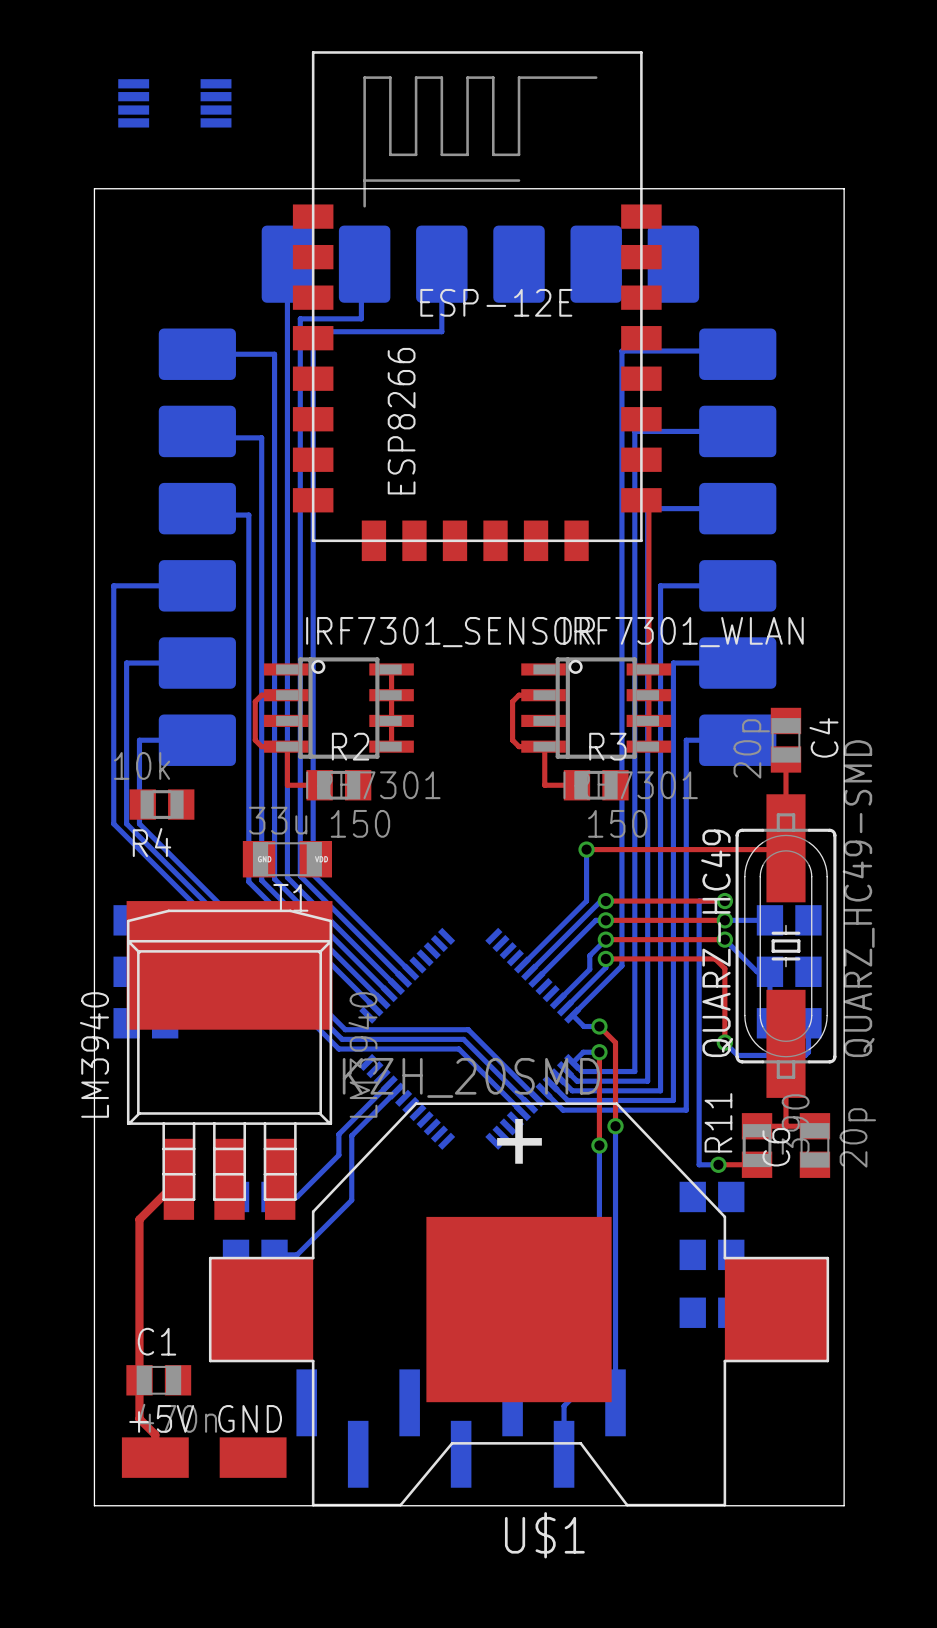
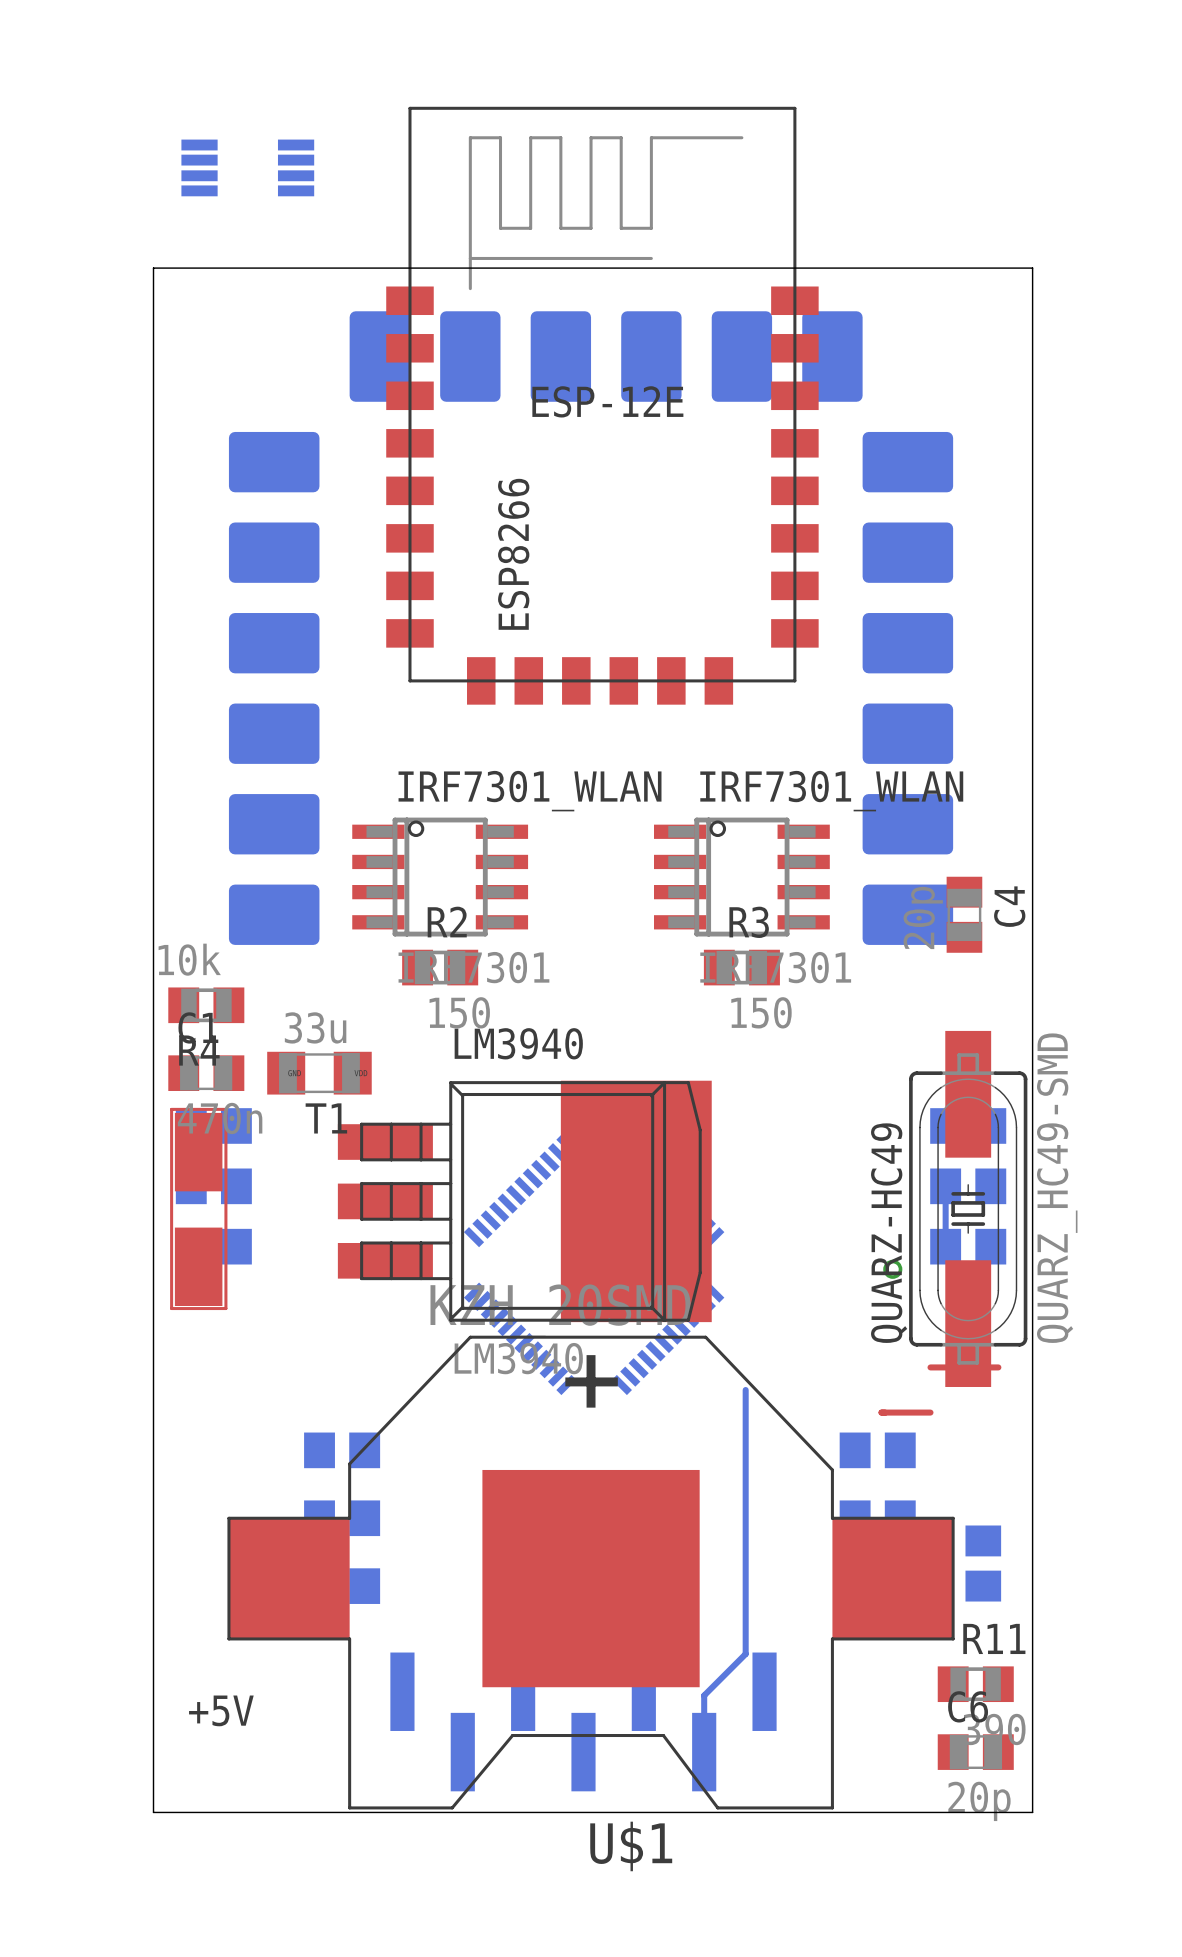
bottom track: (287, 264) (287, 877) (396, 986) -> none
bottom track: (364, 264) (361, 267) (361, 318) (300, 318) (300, 876) (403, 979) -> none
bottom track: (441, 264) (441, 331) (313, 331) (313, 874) (410, 972) -> none
bottom track: (197, 354) (274, 354) (274, 878) (389, 993) -> none
bottom track: (737, 354) (734, 351) (621, 351) (621, 965) (572, 1015) (583, 1026) (599, 1026) -> none
bottom track: (197, 431) (203, 437) (261, 437) (261, 880) (382, 1000) -> none
bottom track: (737, 431) (634, 431) (634, 1071) (581, 1071) (572, 1062) -> none
top track: (641, 500) (648, 507) (648, 746) -> none
bottom track: (197, 508) (203, 515) (248, 515) (248, 881) (374, 1008) -> none
bottom track: (737, 508) (647, 508) (647, 1081) (577, 1081) (565, 1069) -> none
bottom track: (197, 585) (113, 585) (113, 823) (338, 1049) (458, 1049) (522, 1112) -> none
bottom track: (737, 585) (660, 585) (660, 1090) (572, 1090) (558, 1076) -> none
IRF7301_SENSOR name: IRF7301_SENSOR (450, 632) -> IRF7301_WLAN (530, 791)
bottom track: (197, 663) (126, 663) (126, 823) (342, 1039) (463, 1039) (529, 1105) -> none
bottom track: (737, 663) (673, 663) (673, 1100) (567, 1100) (551, 1083) -> none
top track: (391, 669) (391, 746) -> none
top track: (286, 695) (261, 695) (255, 701) (255, 740) (261, 746) (287, 747) (287, 785) (319, 785) -> none
top track: (543, 695) (519, 695) (512, 701) (512, 740) (519, 746) (544, 747) (544, 785) (576, 785) -> none
bottom track: (197, 740) (139, 740) (139, 823) (345, 1029) (468, 1029) (536, 1098) -> none
bottom track: (737, 740) (686, 740) (686, 1110) (563, 1110) (544, 1091) -> none
top track: (785, 759) (784, 849) (586, 849) -> none
R4 position: (161, 804) -> (206, 1005)
bottom track: (586, 849) (586, 900) (522, 965) -> none
via: (586, 849) -> none
T1 position: (287, 859) -> (319, 1073)
top track: (605, 901) (724, 901) -> none
bottom track: (605, 901) (600, 901) (529, 972) -> none
via: (605, 901) -> none
bottom track: (724, 901) (699, 901) (699, 1164) (718, 1164) -> none
via: (724, 901) -> none
top track: (605, 920) (724, 920) -> none
bottom track: (605, 920) (595, 920) (536, 979) -> none
via: (605, 920) -> none
bottom track: (724, 920) (769, 920) -> none
via: (724, 920) -> none
top track: (605, 939) (724, 939) -> none
bottom track: (605, 939) (589, 955) (589, 969) (558, 1000) -> none
via: (605, 939) -> none
bottom track: (724, 939) (757, 971) (769, 971) (766, 968) (763, 971) -> none
via: (724, 939) -> none
QUARZ-HC49 position: (785, 946) -> (968, 1208)
top track: (605, 958) (715, 958) (724, 968) (724, 1042) -> none
bottom track: (605, 958) (605, 967) (565, 1008) -> none
via: (605, 958) -> none
part: none -> (198, 1208)
bottom track: (808, 1023) (808, 1052) (805, 1055) (737, 1055) (724, 1042) -> none
top track: (599, 1026) (615, 1042) (615, 1126) -> none
via: (599, 1026) -> none
top track: (599, 1052) (599, 1145) -> none
bottom track: (599, 1052) (583, 1052) (573, 1063) -> none
via: (599, 1052) -> none
LM3940 rotation: 0° (229, 1060) -> 90° clockwise (524, 1201)
LM3940 position: (229, 1060) -> (524, 1201)
bottom track: (389, 1083) (338, 1134) (338, 1155) (297, 1196) (274, 1196) -> none
bottom track: (396, 1091) (351, 1135) (351, 1200) (297, 1254) (274, 1254) -> none
bottom track: (615, 1126) (615, 1402) -> none
via: (615, 1126) -> none
via: (599, 1145) -> none
R11 rotation: 0° (757, 1145) -> 90° clockwise (975, 1684)
R11 position: (757, 1145) -> (975, 1684)
C6 rotation: 0° (814, 1145) -> 90° clockwise (975, 1752)
C6 position: (814, 1145) -> (975, 1752)
via: (718, 1164) -> none
top track: (178, 1179) (139, 1219) (139, 1418) (155, 1434) (155, 1457) -> none
U$1 position: (519, 1304) -> (591, 1572)
C1 position: (158, 1380) -> (206, 1073)
text: GND (250, 1418) -> none
part: (204, 1457) -> none

